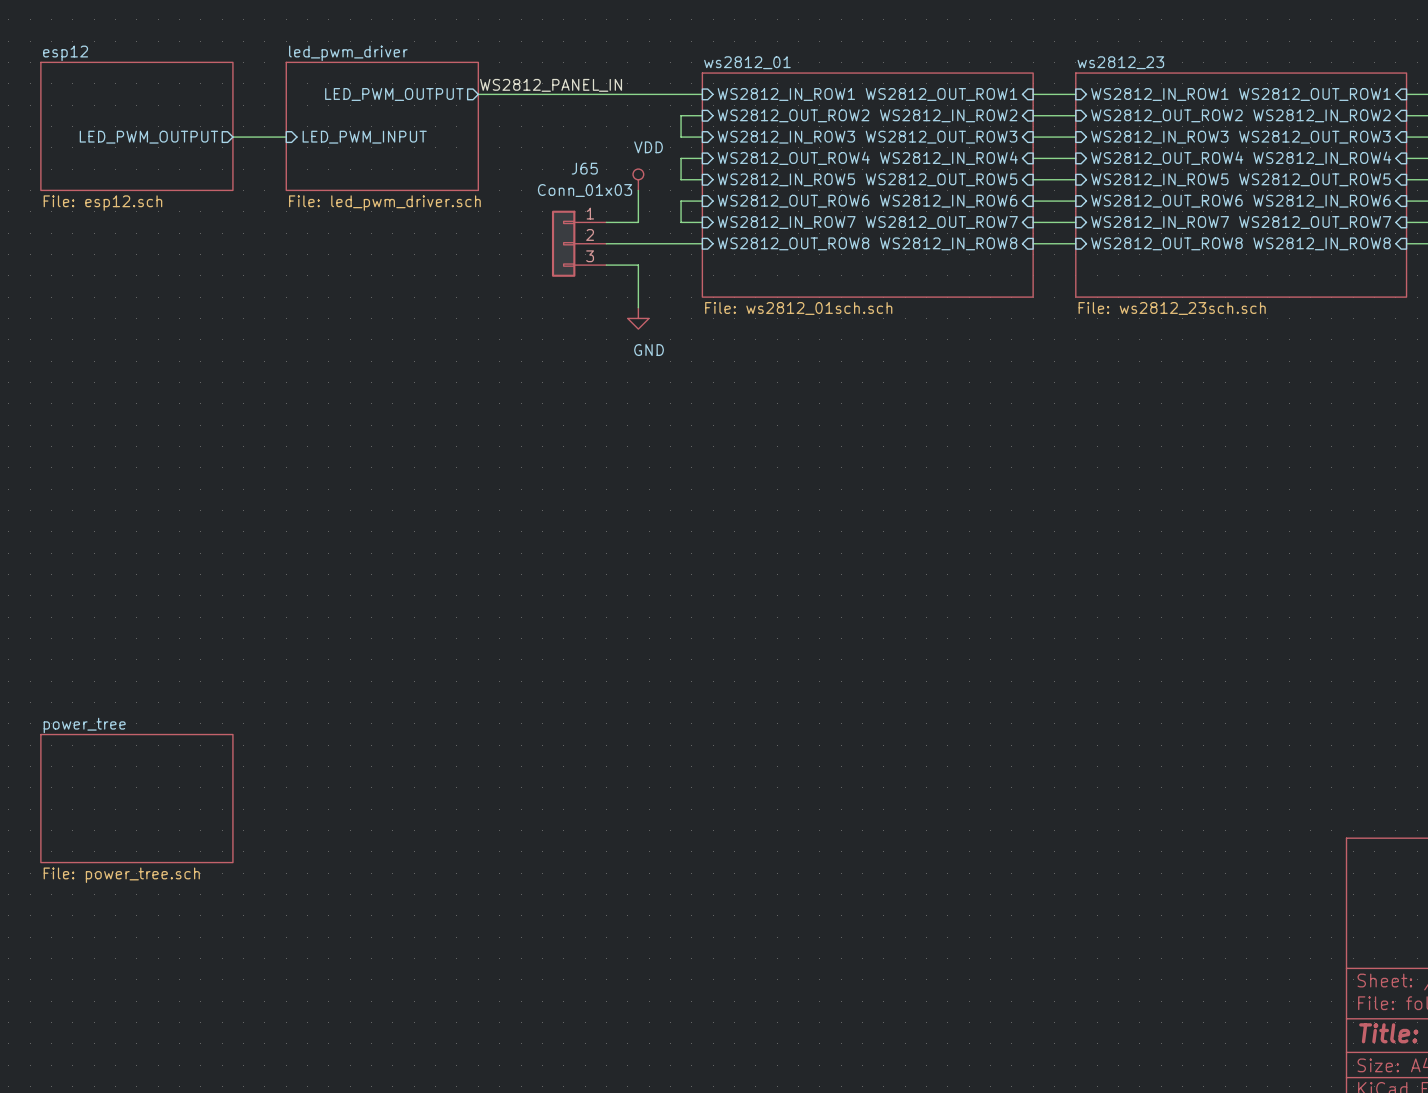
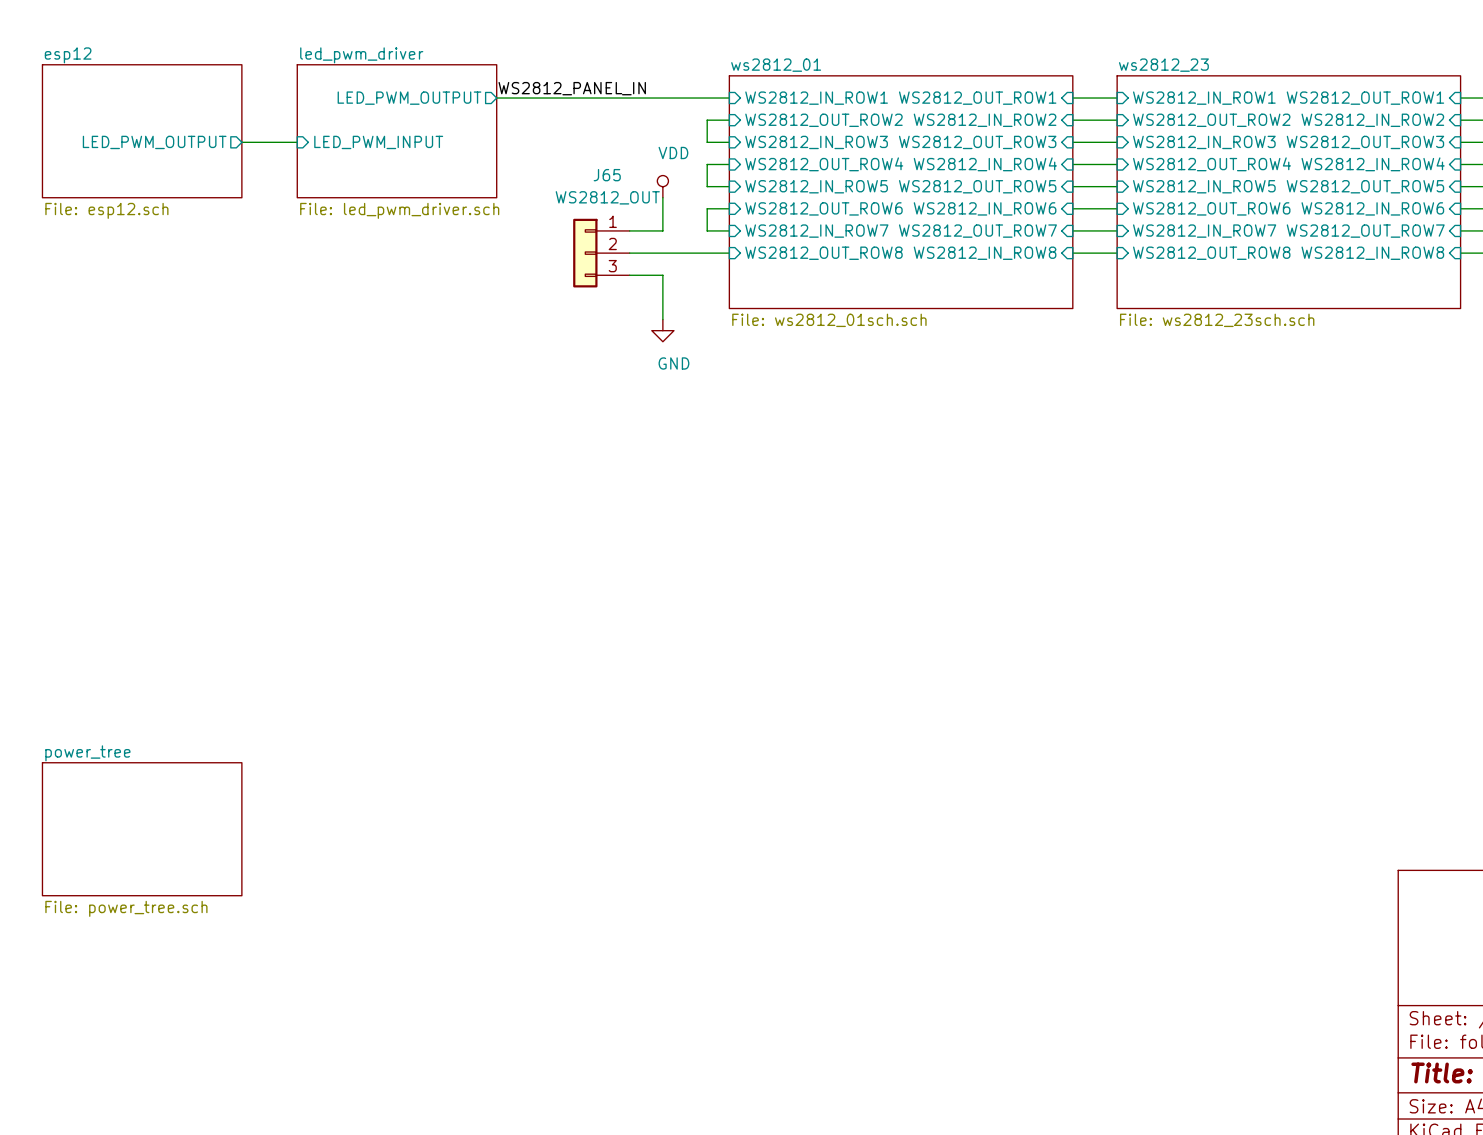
J65 value: Conn_01x03 (585, 190) -> WS2812_OUT (607, 197)

